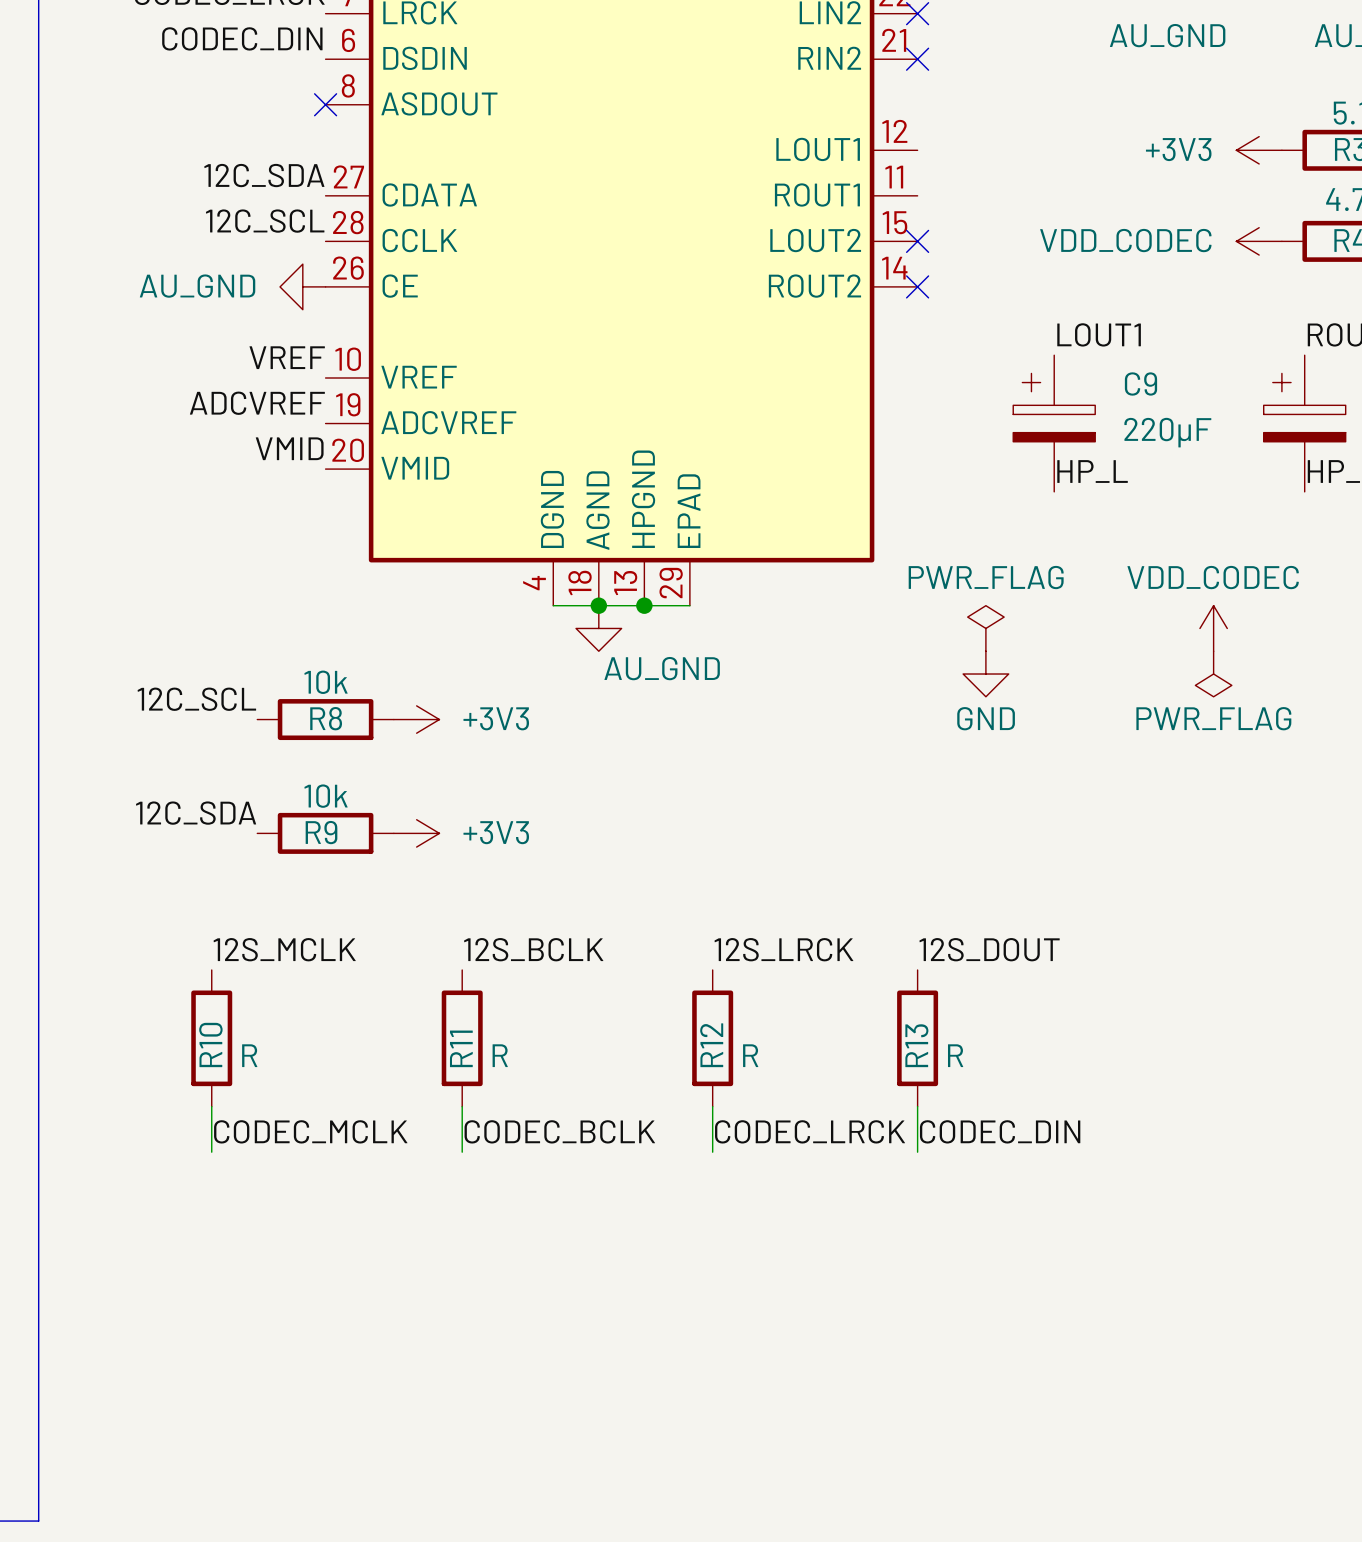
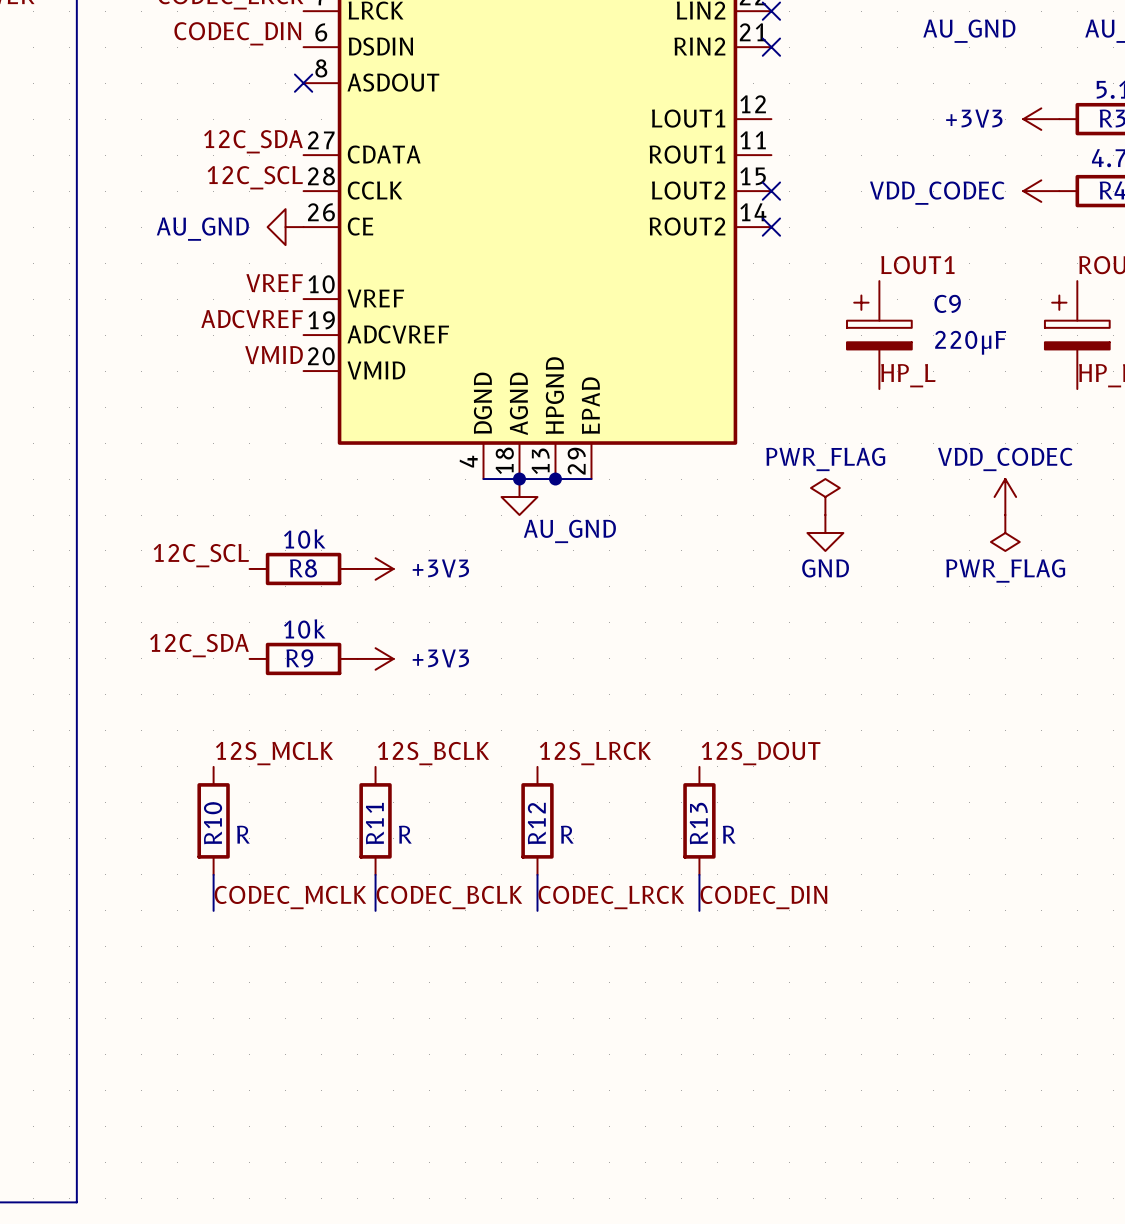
label position: 12S_BCLK (533, 949) -> 12S_BCLK (433, 753)
label position: 12S_LRCK (783, 949) -> 12S_LRCK (595, 753)
label position: 12S_DOUT (989, 949) -> 12S_DOUT (761, 753)
R11 position: (462, 1038) -> (375, 820)
R12 position: (712, 1038) -> (537, 820)
R13 position: (917, 1038) -> (699, 820)
wire: (462, 1106) (462, 1152) -> (375, 874) (375, 910)
wire: (712, 1106) (712, 1152) -> (537, 874) (537, 910)
wire: (917, 1106) (917, 1152) -> (699, 874) (699, 910)
label position: CODEC_BCLK (559, 1131) -> CODEC_BCLK (449, 897)
label position: CODEC_LRCK (810, 1131) -> CODEC_LRCK (611, 897)
label position: CODEC_DIN (1000, 1131) -> CODEC_DIN (763, 897)

